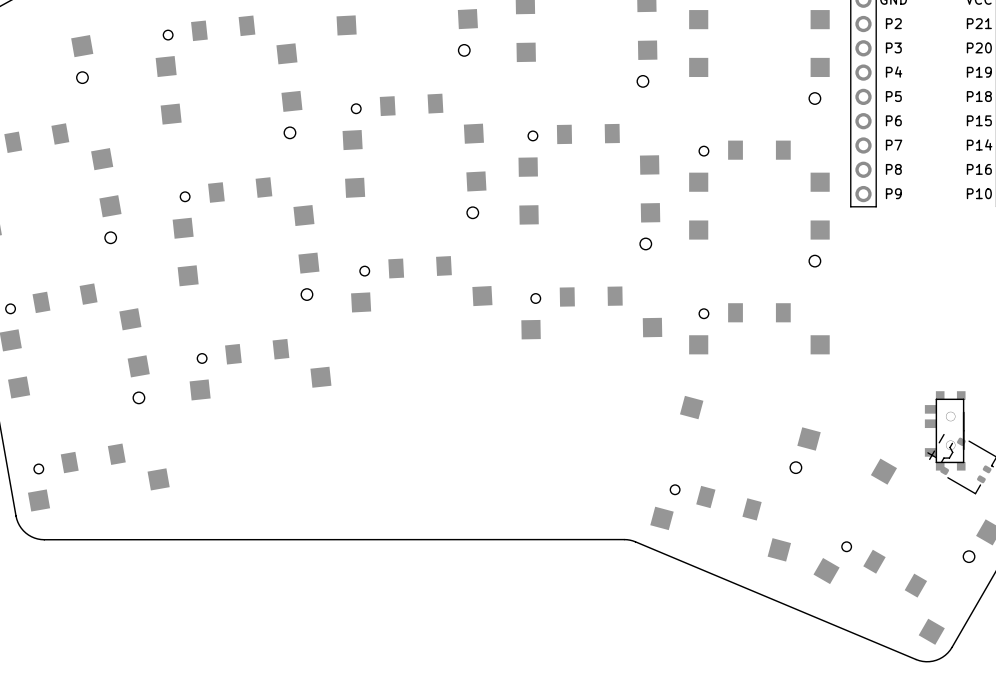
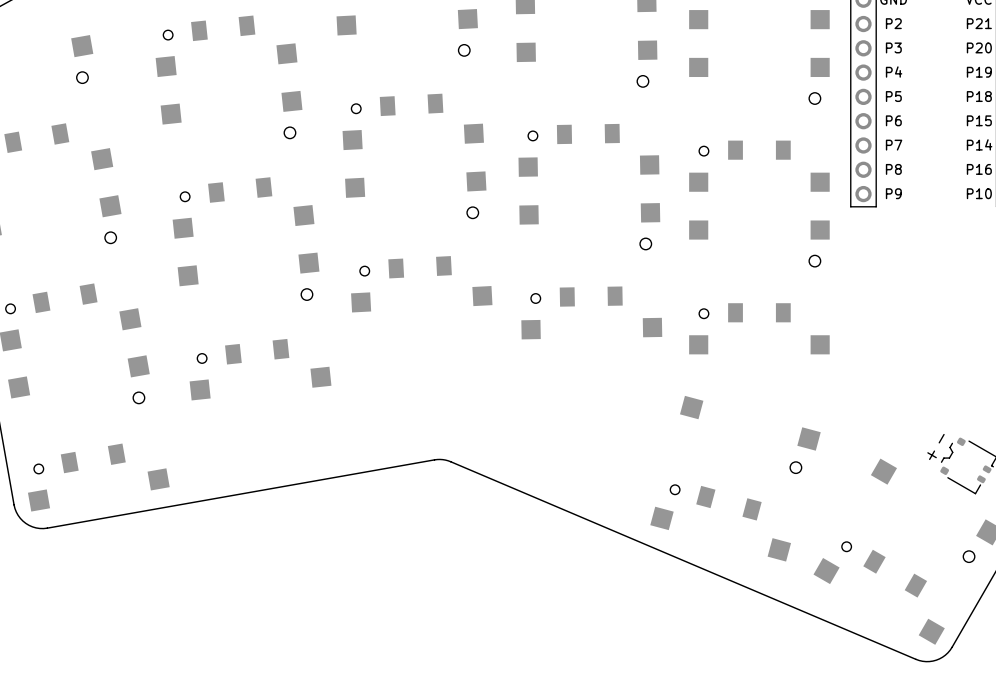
part: (945, 430) -> none
board edge: (14, 504) (16, 519) (23, 530) (34, 538) (44, 539) (629, 540) (919, 660) (929, 661) (939, 658) (952, 647) -> (14, 504) (18, 515) (25, 523) (43, 528) (442, 459) (916, 659) (926, 661) (936, 660) (945, 655) (952, 647)

